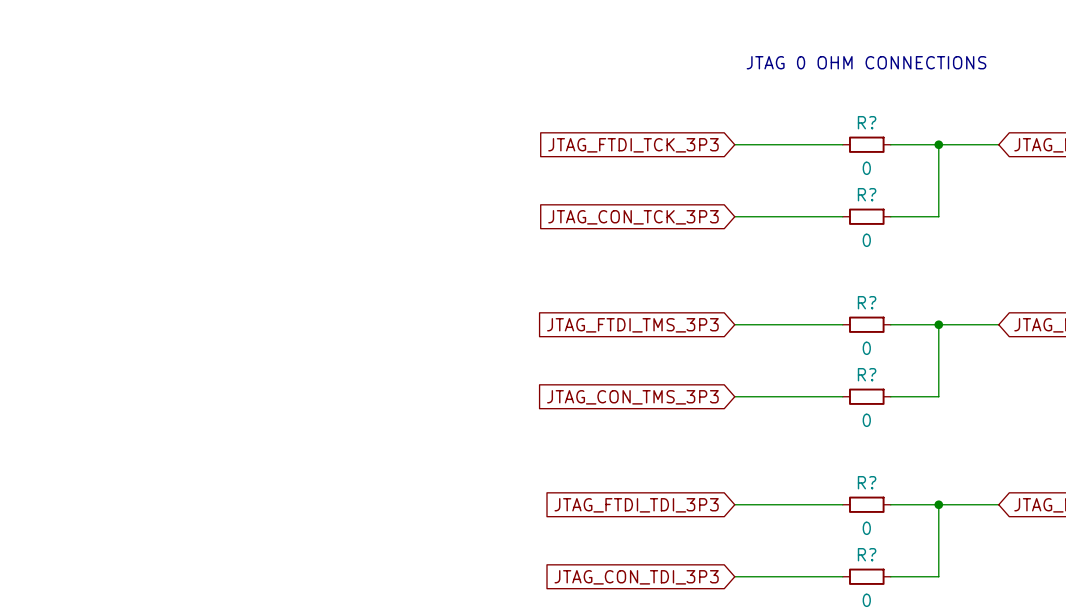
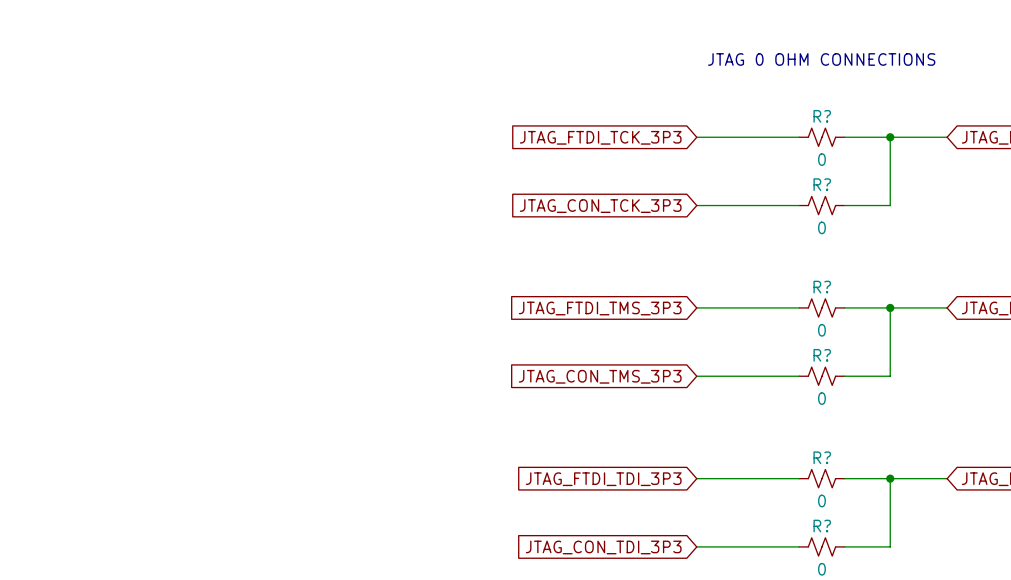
R? symbol: [842, 136, 891, 153] -> [799, 128, 845, 147]
R? symbol: [842, 208, 891, 225] -> [799, 196, 845, 215]
R? symbol: [842, 316, 891, 333] -> [799, 298, 845, 318]
R? symbol: [842, 388, 891, 405] -> [799, 367, 845, 386]
R? symbol: [842, 496, 891, 513] -> [799, 469, 845, 488]
R? symbol: [842, 568, 891, 585] -> [799, 537, 845, 557]

